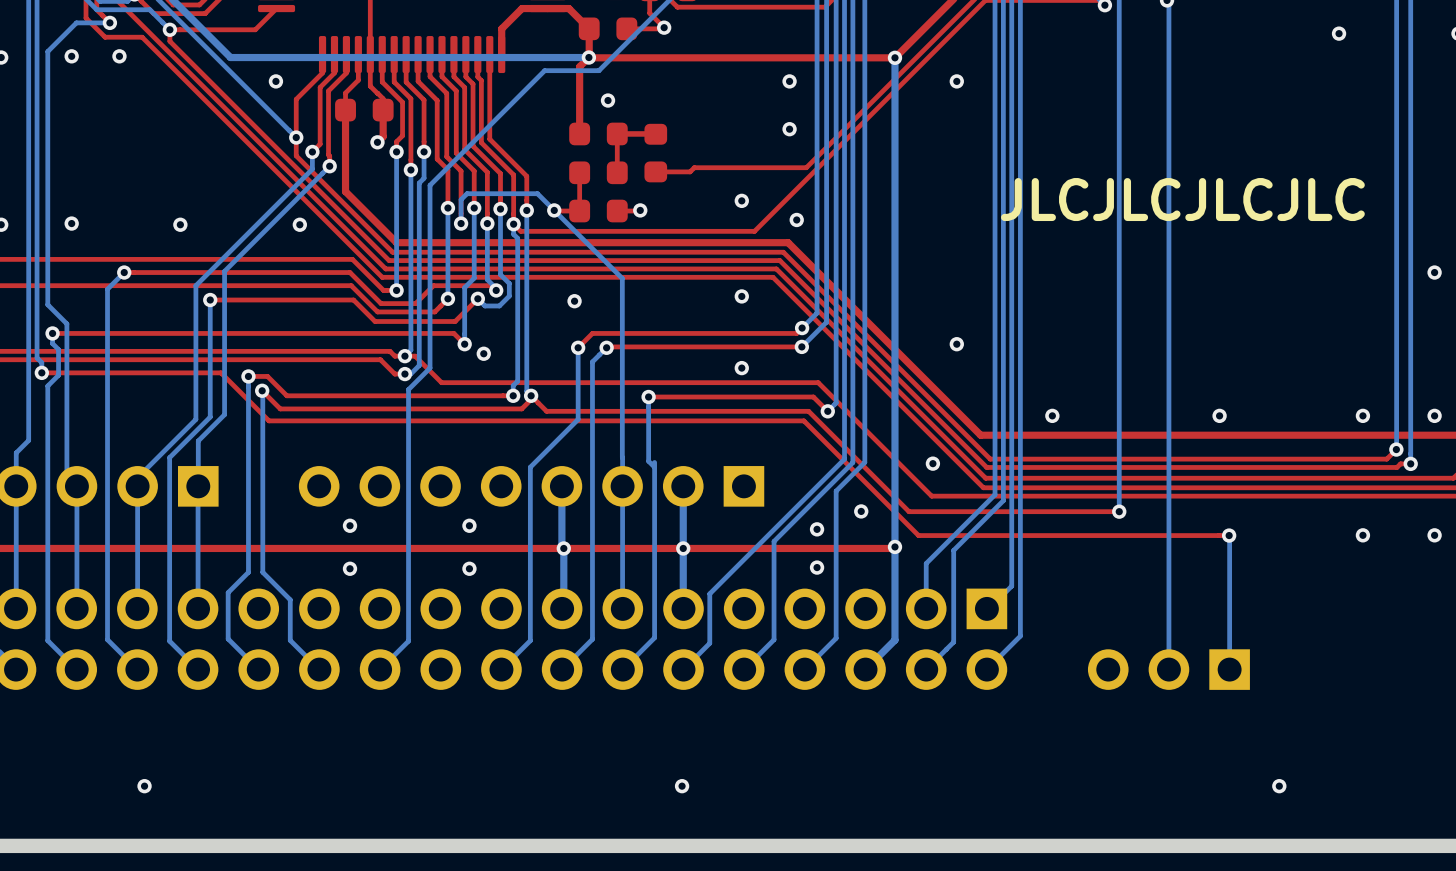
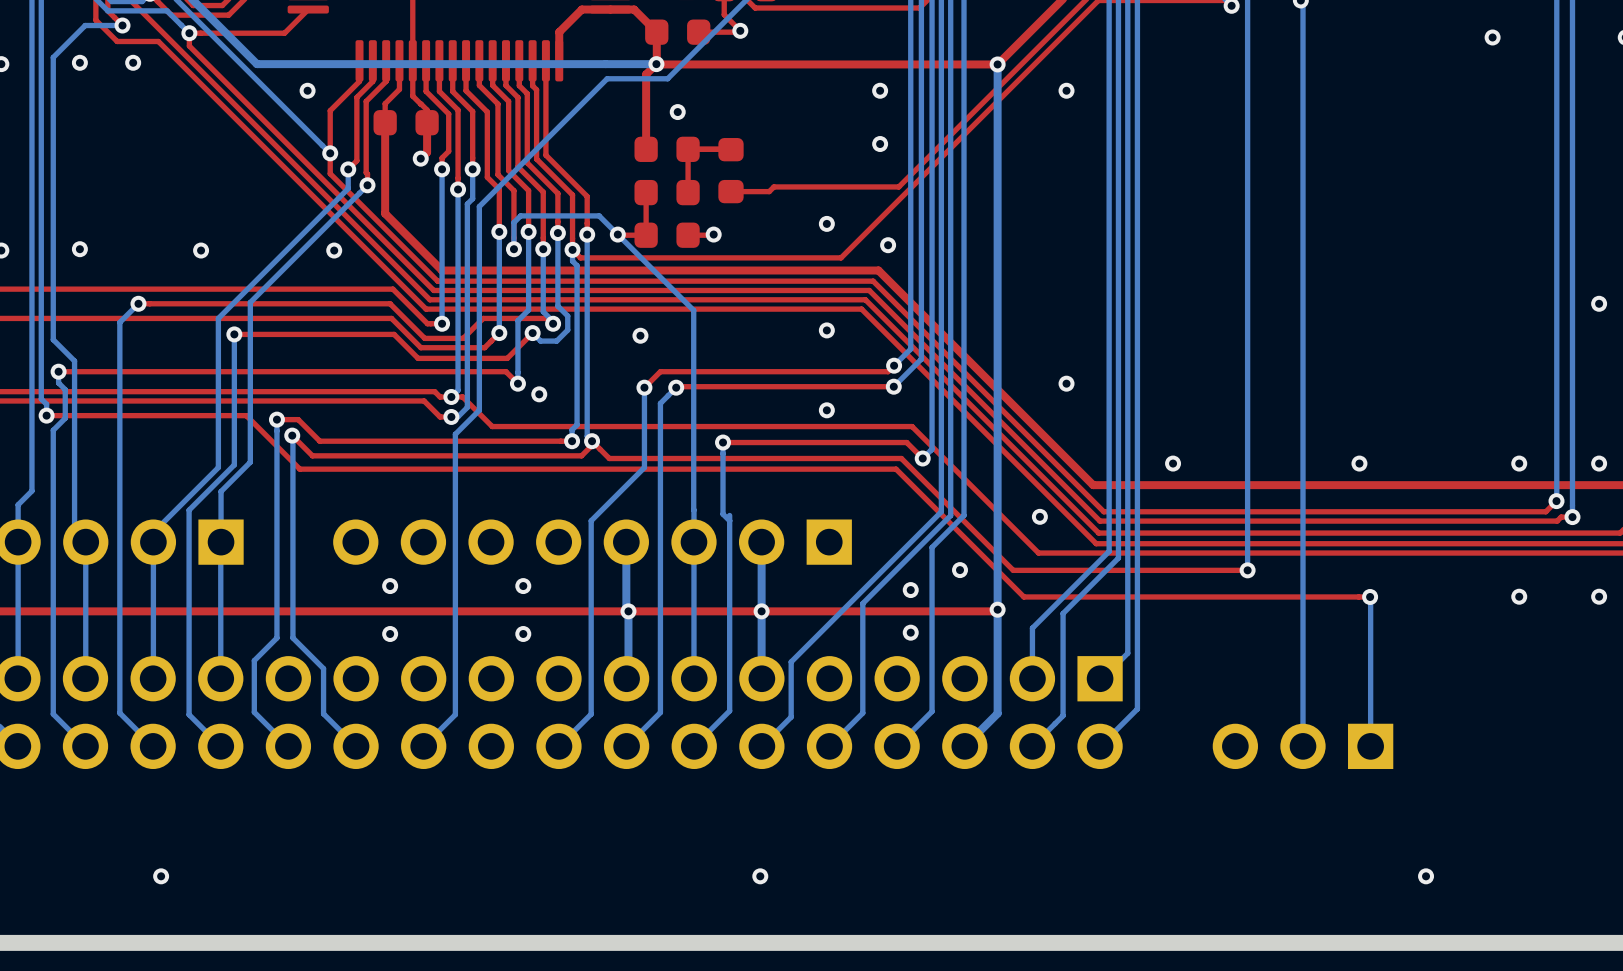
text: JLCJLCJLCJLC (1182, 199) -> none

